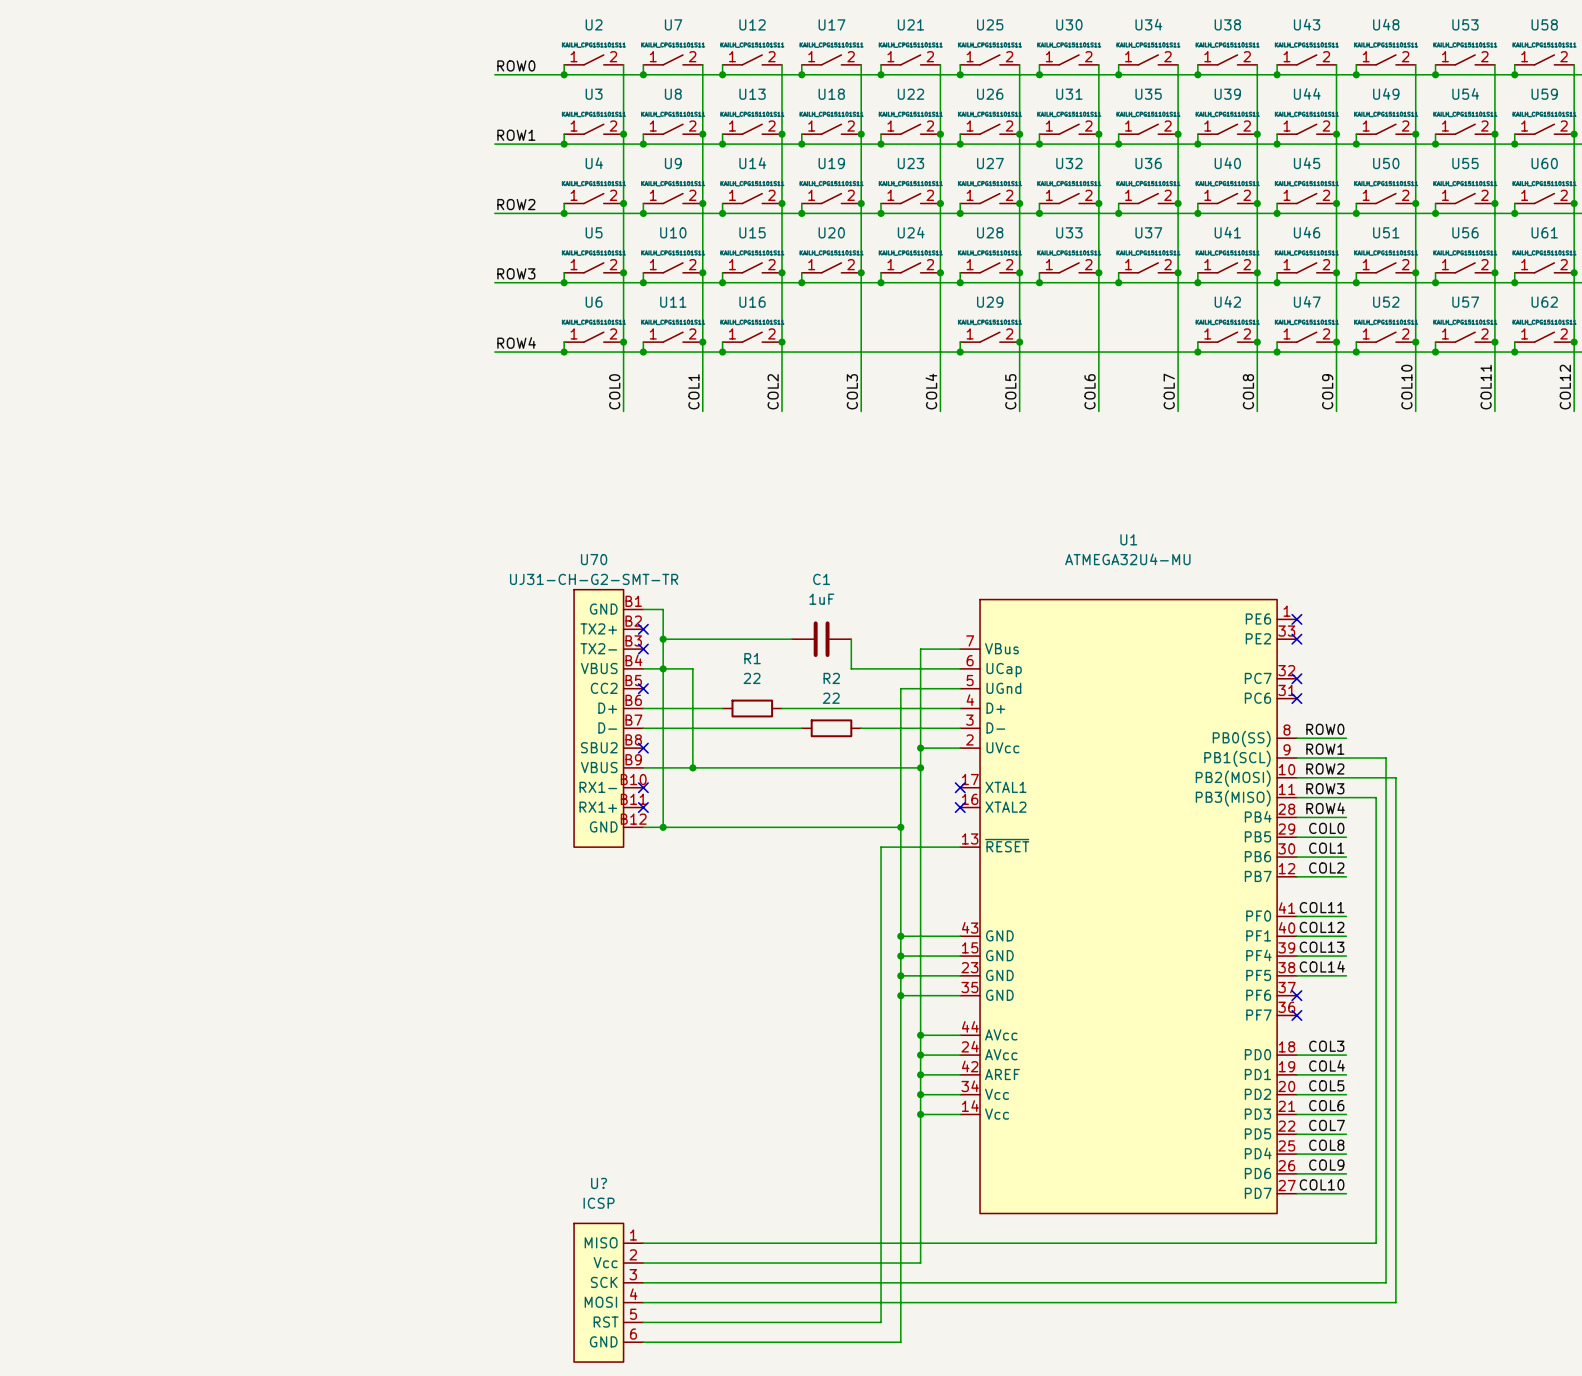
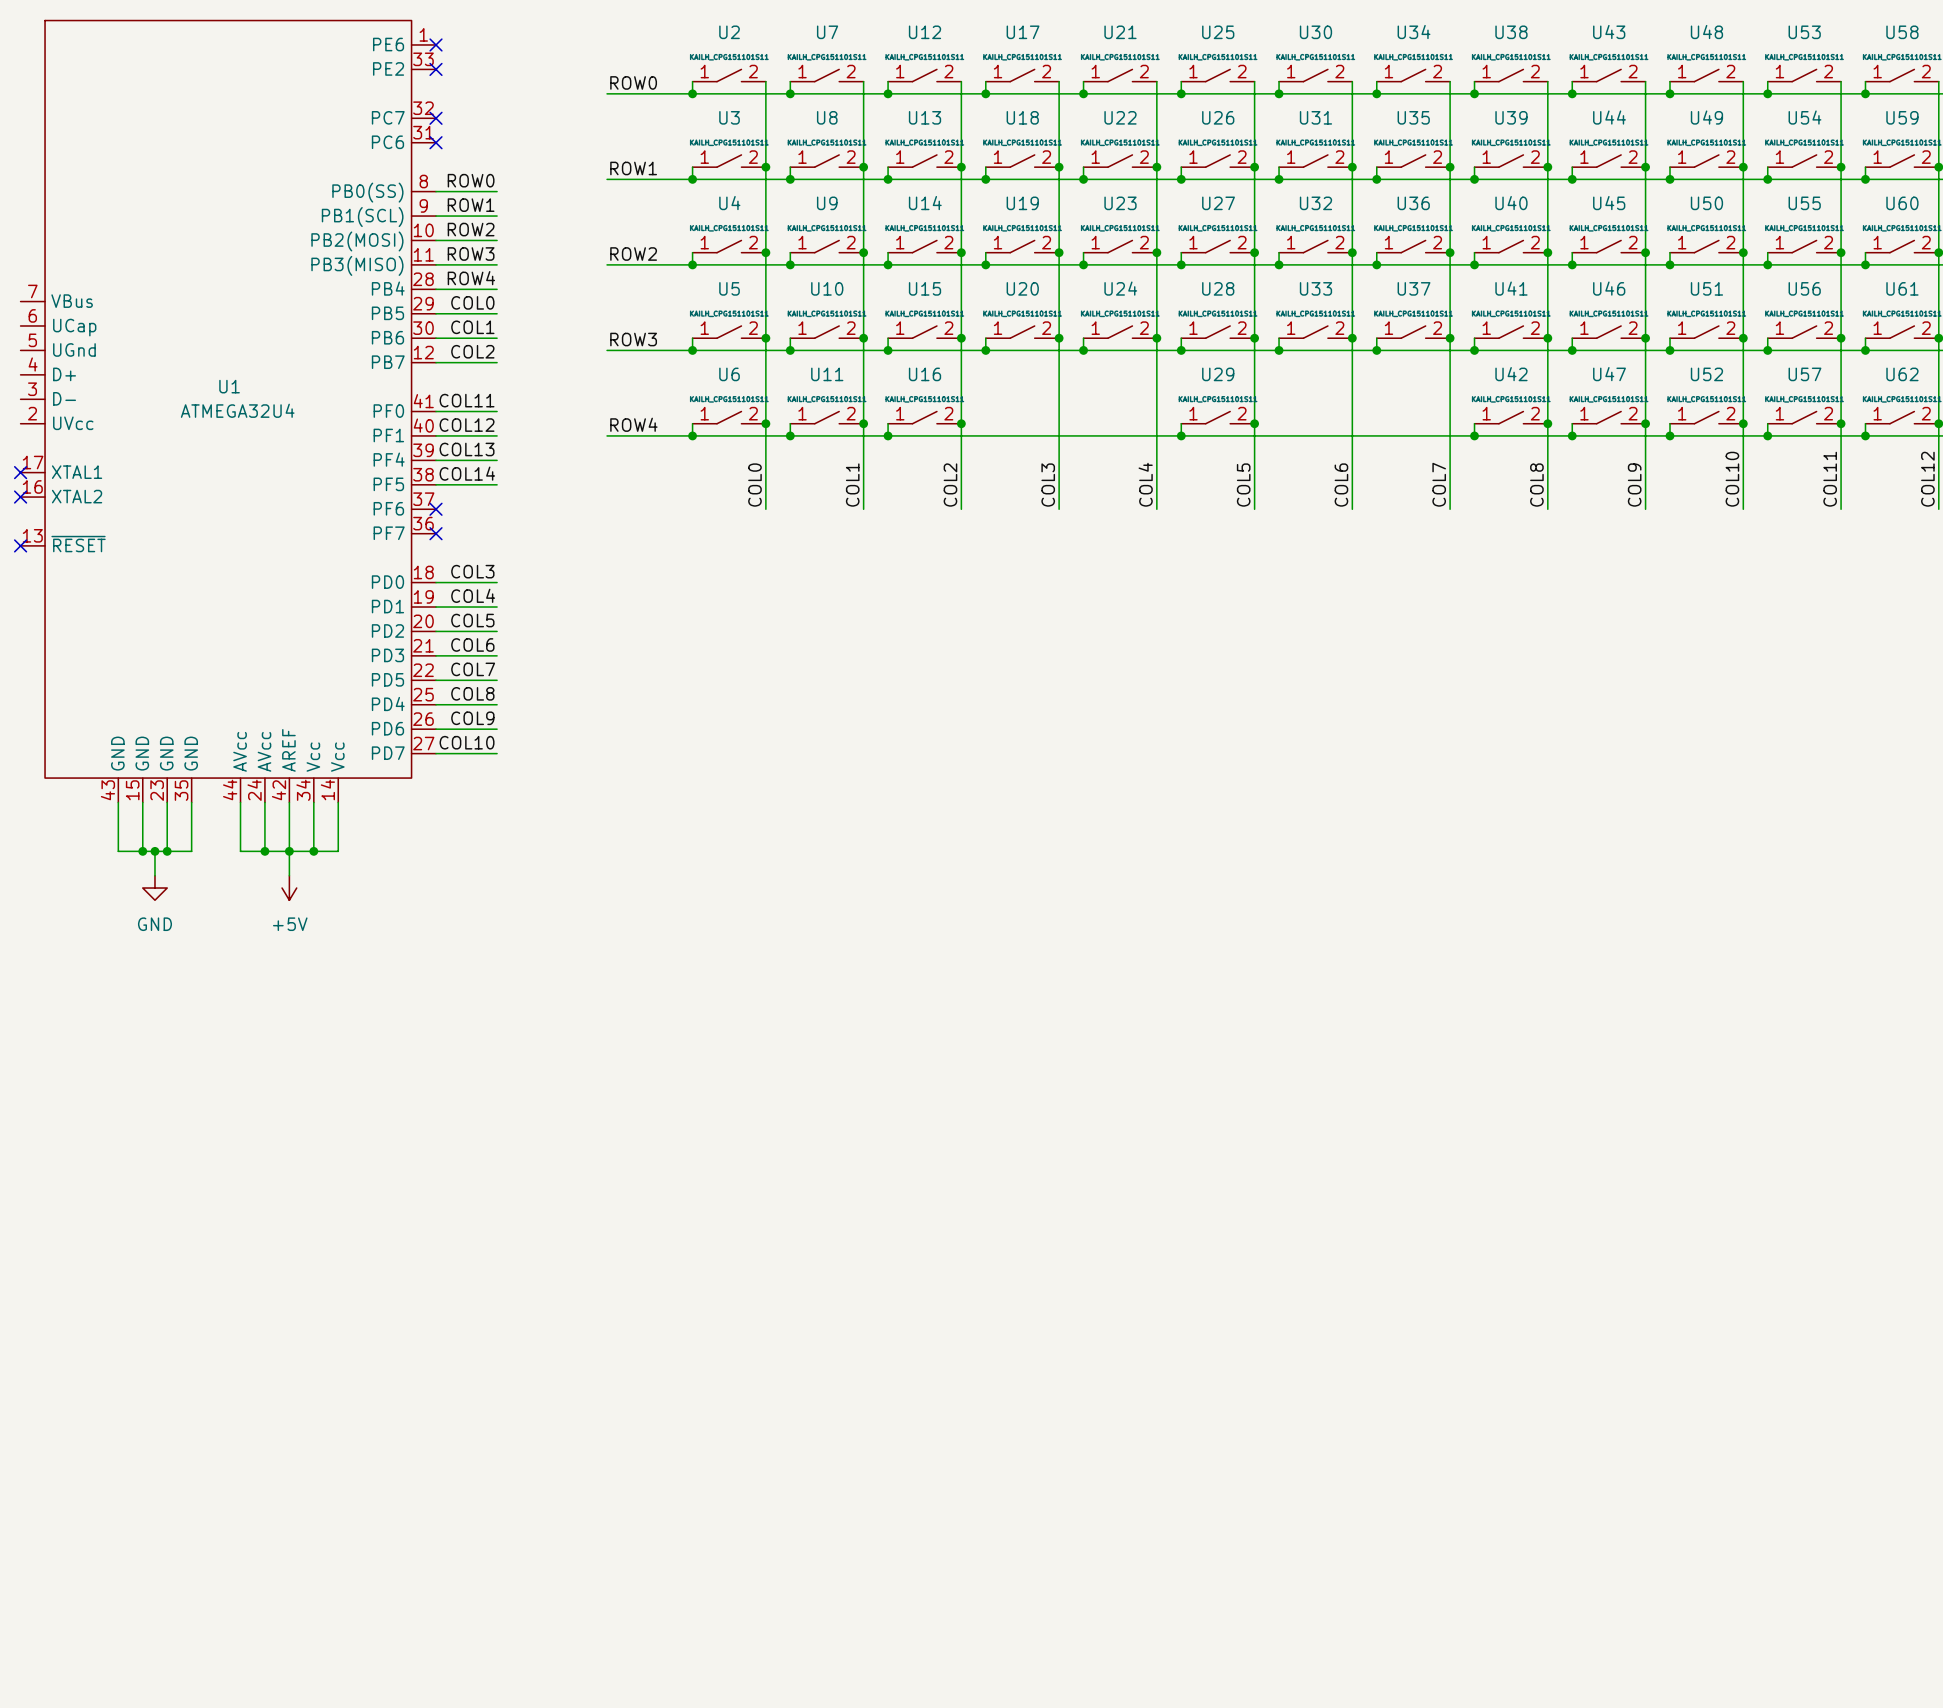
no-connect mark: none -> (436, 44)
no-connect mark: none -> (436, 69)
no-connect mark: none -> (436, 118)
no-connect mark: none -> (436, 142)
label: none -> ROW0 (471, 180)
wire: none -> (436, 191) (497, 191)
label: none -> ROW1 (471, 205)
wire: none -> (436, 216) (497, 216)
label: none -> ROW2 (471, 229)
wire: none -> (436, 240) (497, 240)
label: none -> ROW3 (471, 254)
wire: none -> (436, 264) (497, 264)
label: none -> ROW4 (471, 278)
wire: none -> (436, 289) (497, 289)
label: none -> COL0 (472, 302)
wire: none -> (436, 313) (497, 313)
label: none -> COL1 (472, 327)
wire: none -> (436, 338) (497, 338)
label: none -> COL2 (472, 351)
wire: none -> (436, 362) (497, 362)
label: none -> COL11 (467, 400)
wire: none -> (436, 411) (497, 411)
label: none -> COL12 (467, 425)
wire: none -> (436, 435) (497, 435)
label: none -> COL13 (467, 449)
wire: none -> (436, 460) (497, 460)
no-connect mark: none -> (20, 472)
label: none -> COL14 (467, 473)
wire: none -> (436, 484) (497, 484)
no-connect mark: none -> (20, 497)
no-connect mark: none -> (436, 509)
no-connect mark: none -> (436, 533)
no-connect mark: none -> (20, 545)
label: none -> COL3 (472, 571)
wire: none -> (436, 582) (497, 582)
label: none -> COL4 (473, 595)
wire: none -> (436, 607) (497, 607)
label: none -> COL5 (472, 620)
wire: none -> (436, 631) (497, 631)
label: none -> COL6 (472, 644)
wire: none -> (436, 655) (497, 655)
U1 name position: U1 (1128, 539) -> U1 (229, 386)
label: none -> COL7 (473, 669)
wire: none -> (436, 680) (497, 680)
U1 value: ATMEGA32U4-MU (1127, 559) -> ATMEGA32U4 (237, 410)
label: none -> COL8 (472, 693)
wire: none -> (436, 704) (497, 704)
label: none -> COL9 (472, 718)
wire: none -> (436, 729) (497, 729)
U1 symbol: [960, 599, 1297, 1214] -> [20, 20, 437, 803]
label: none -> COL10 (467, 742)
wire: none -> (436, 753) (497, 753)
wire: (643, 609) (663, 609) (663, 827) -> none
no-connect mark: (1296, 619) -> none
no-connect mark: (643, 629) -> none
wire: (663, 639) (791, 639) -> none
junction: (663, 639) -> none
C1: 1uF (821, 639) -> none
wire: (851, 639) (851, 668) (960, 668) -> none
no-connect mark: (1296, 639) -> none
wire: none -> (118, 802) (118, 851) (191, 851) (191, 802)
wire: none -> (142, 802) (142, 851)
wire: none -> (167, 802) (167, 851)
wire: none -> (240, 802) (240, 851) (338, 851) (338, 802)
wire: none -> (264, 802) (264, 851)
wire: none -> (289, 802) (289, 875)
wire: none -> (313, 802) (313, 851)
no-connect mark: (643, 649) -> none
wire: (960, 649) (920, 649) (920, 1263) (643, 1263) -> none
wire: (643, 668) (692, 668) (692, 767) -> none
junction: (663, 668) -> none
no-connect mark: (1296, 678) -> none
junction: none -> (142, 851)
wire: none -> (154, 851) (154, 875)
junction: none -> (154, 851)
junction: none -> (167, 851)
junction: none -> (264, 851)
junction: none -> (289, 851)
junction: none -> (313, 851)
no-connect mark: (643, 688) -> none
wire: (960, 688) (900, 688) (900, 1342) (643, 1342) -> none
no-connect mark: (1296, 698) -> none
wire: (643, 708) (722, 708) -> none
R1: 22 (752, 708) -> none
wire: (781, 708) (960, 708) -> none
power symbol: none -> GND (154, 888)
power symbol: none -> +5V (289, 888)
U70: UJ31-CH-G2-SMT-TR (608, 718) -> none
wire: (643, 728) (801, 728) -> none
R2: 22 (831, 728) -> none
wire: (861, 728) (960, 728) -> none
label: ROW0 (1325, 729) -> none
wire: (1296, 738) (1346, 738) -> none
no-connect mark: (643, 748) -> none
wire: (920, 748) (960, 748) -> none
junction: (920, 748) -> none
label: ROW1 (1325, 749) -> none
wire: (1296, 758) (1386, 758) (1386, 1282) (643, 1282) -> none
wire: (643, 767) (920, 767) -> none
junction: (692, 767) -> none
junction: (920, 767) -> none
label: ROW2 (1325, 768) -> none
wire: (1296, 777) (1395, 777) (1395, 1302) (643, 1302) -> none
no-connect mark: (643, 787) -> none
no-connect mark: (960, 787) -> none
label: ROW3 (1325, 788) -> none
wire: (1296, 797) (1376, 797) (1376, 1243) (643, 1243) -> none
no-connect mark: (643, 807) -> none
no-connect mark: (960, 807) -> none
label: ROW4 (1325, 808) -> none
wire: (1296, 817) (1346, 817) -> none
wire: (643, 827) (900, 827) -> none
junction: (663, 827) -> none
junction: (900, 827) -> none
label: COL0 (1326, 828) -> none
wire: (1296, 837) (1346, 837) -> none
wire: (960, 847) (881, 847) (881, 1322) (643, 1322) -> none
label: COL1 (1326, 848) -> none
wire: (1296, 857) (1346, 857) -> none
label: COL2 (1326, 868) -> none
wire: (1296, 876) (1346, 876) -> none
label: COL11 (1322, 907) -> none
wire: (1296, 916) (1346, 916) -> none
label: COL12 (1322, 927) -> none
wire: (900, 936) (960, 936) -> none
junction: (900, 936) -> none
wire: (1296, 936) (1346, 936) -> none
label: COL13 (1322, 947) -> none
wire: (900, 956) (960, 956) -> none
junction: (900, 956) -> none
wire: (1296, 956) (1346, 956) -> none
label: COL14 (1322, 966) -> none
wire: (900, 975) (960, 975) -> none
junction: (900, 975) -> none
wire: (1296, 975) (1346, 975) -> none
wire: (900, 995) (960, 995) -> none
junction: (900, 995) -> none
no-connect mark: (1296, 995) -> none
no-connect mark: (1296, 1015) -> none
wire: (920, 1035) (960, 1035) -> none
junction: (920, 1035) -> none
label: COL3 (1326, 1046) -> none
wire: (920, 1055) (960, 1055) -> none
junction: (920, 1055) -> none
wire: (1296, 1055) (1346, 1055) -> none
label: COL4 (1327, 1065) -> none
wire: (920, 1074) (960, 1074) -> none
junction: (920, 1074) -> none
wire: (1296, 1074) (1346, 1074) -> none
label: COL5 (1326, 1085) -> none
wire: (920, 1094) (960, 1094) -> none
junction: (920, 1094) -> none
wire: (1296, 1094) (1346, 1094) -> none
label: COL6 (1326, 1105) -> none
wire: (920, 1114) (960, 1114) -> none
junction: (920, 1114) -> none
wire: (1296, 1114) (1346, 1114) -> none
label: COL7 (1327, 1125) -> none
wire: (1296, 1134) (1346, 1134) -> none
label: COL8 (1326, 1145) -> none
wire: (1296, 1154) (1346, 1154) -> none
label: COL9 (1326, 1165) -> none
wire: (1296, 1173) (1346, 1173) -> none
label: COL10 (1322, 1184) -> none
wire: (1296, 1193) (1346, 1193) -> none
U?: ICSP (608, 1292) -> none

